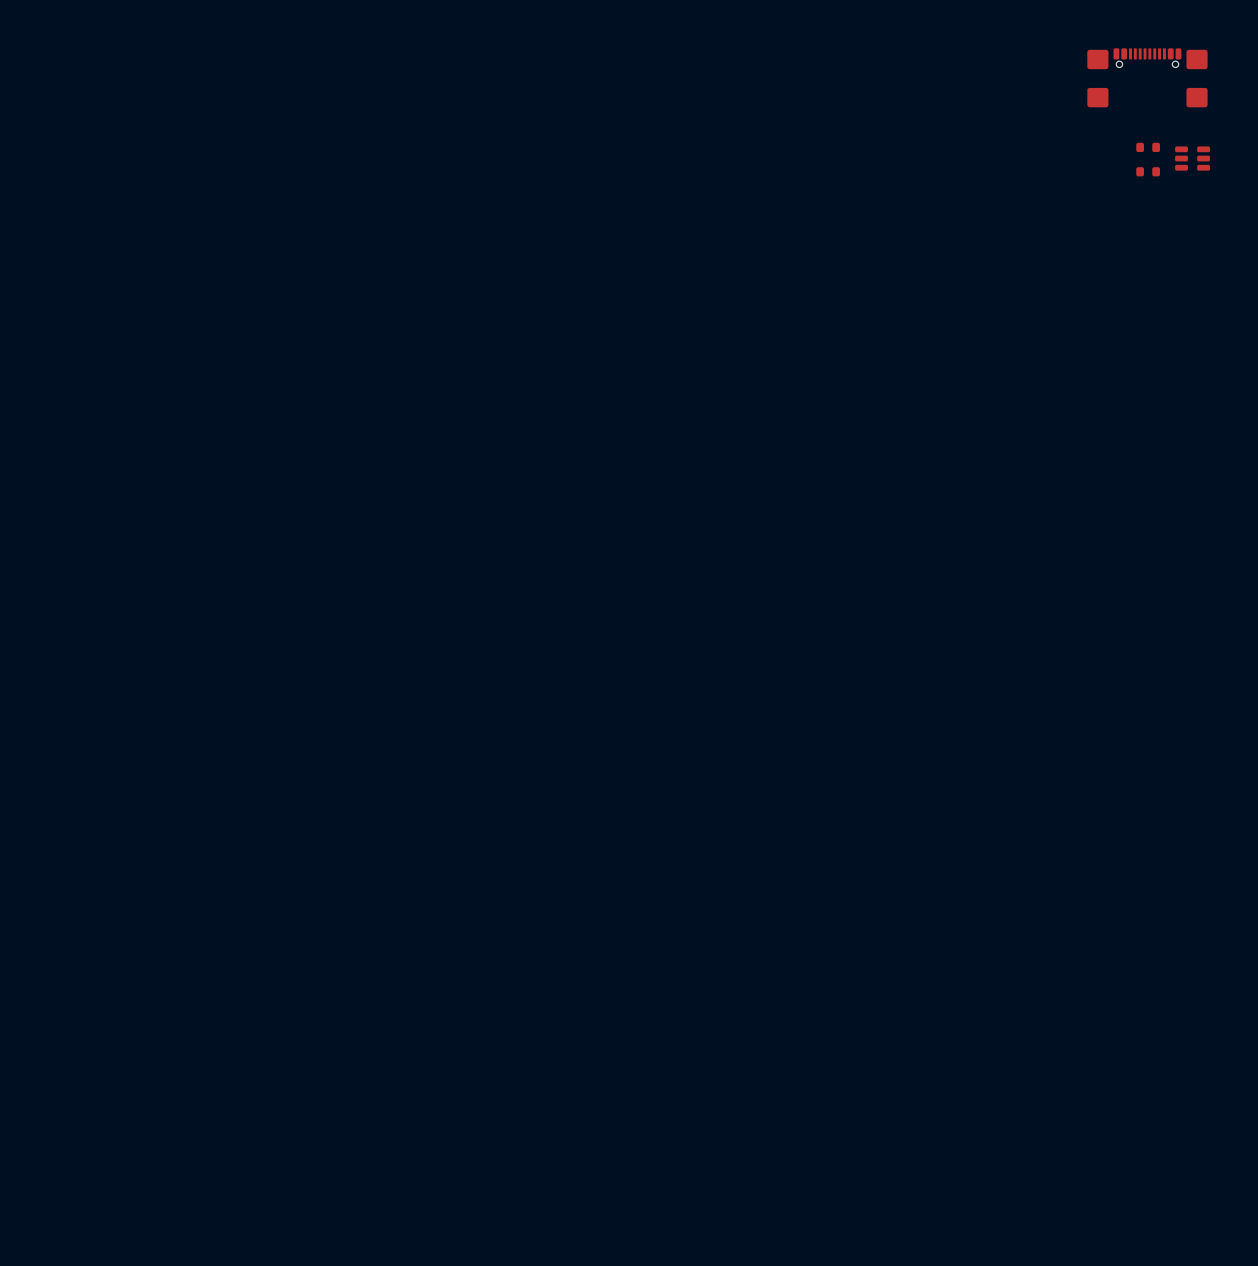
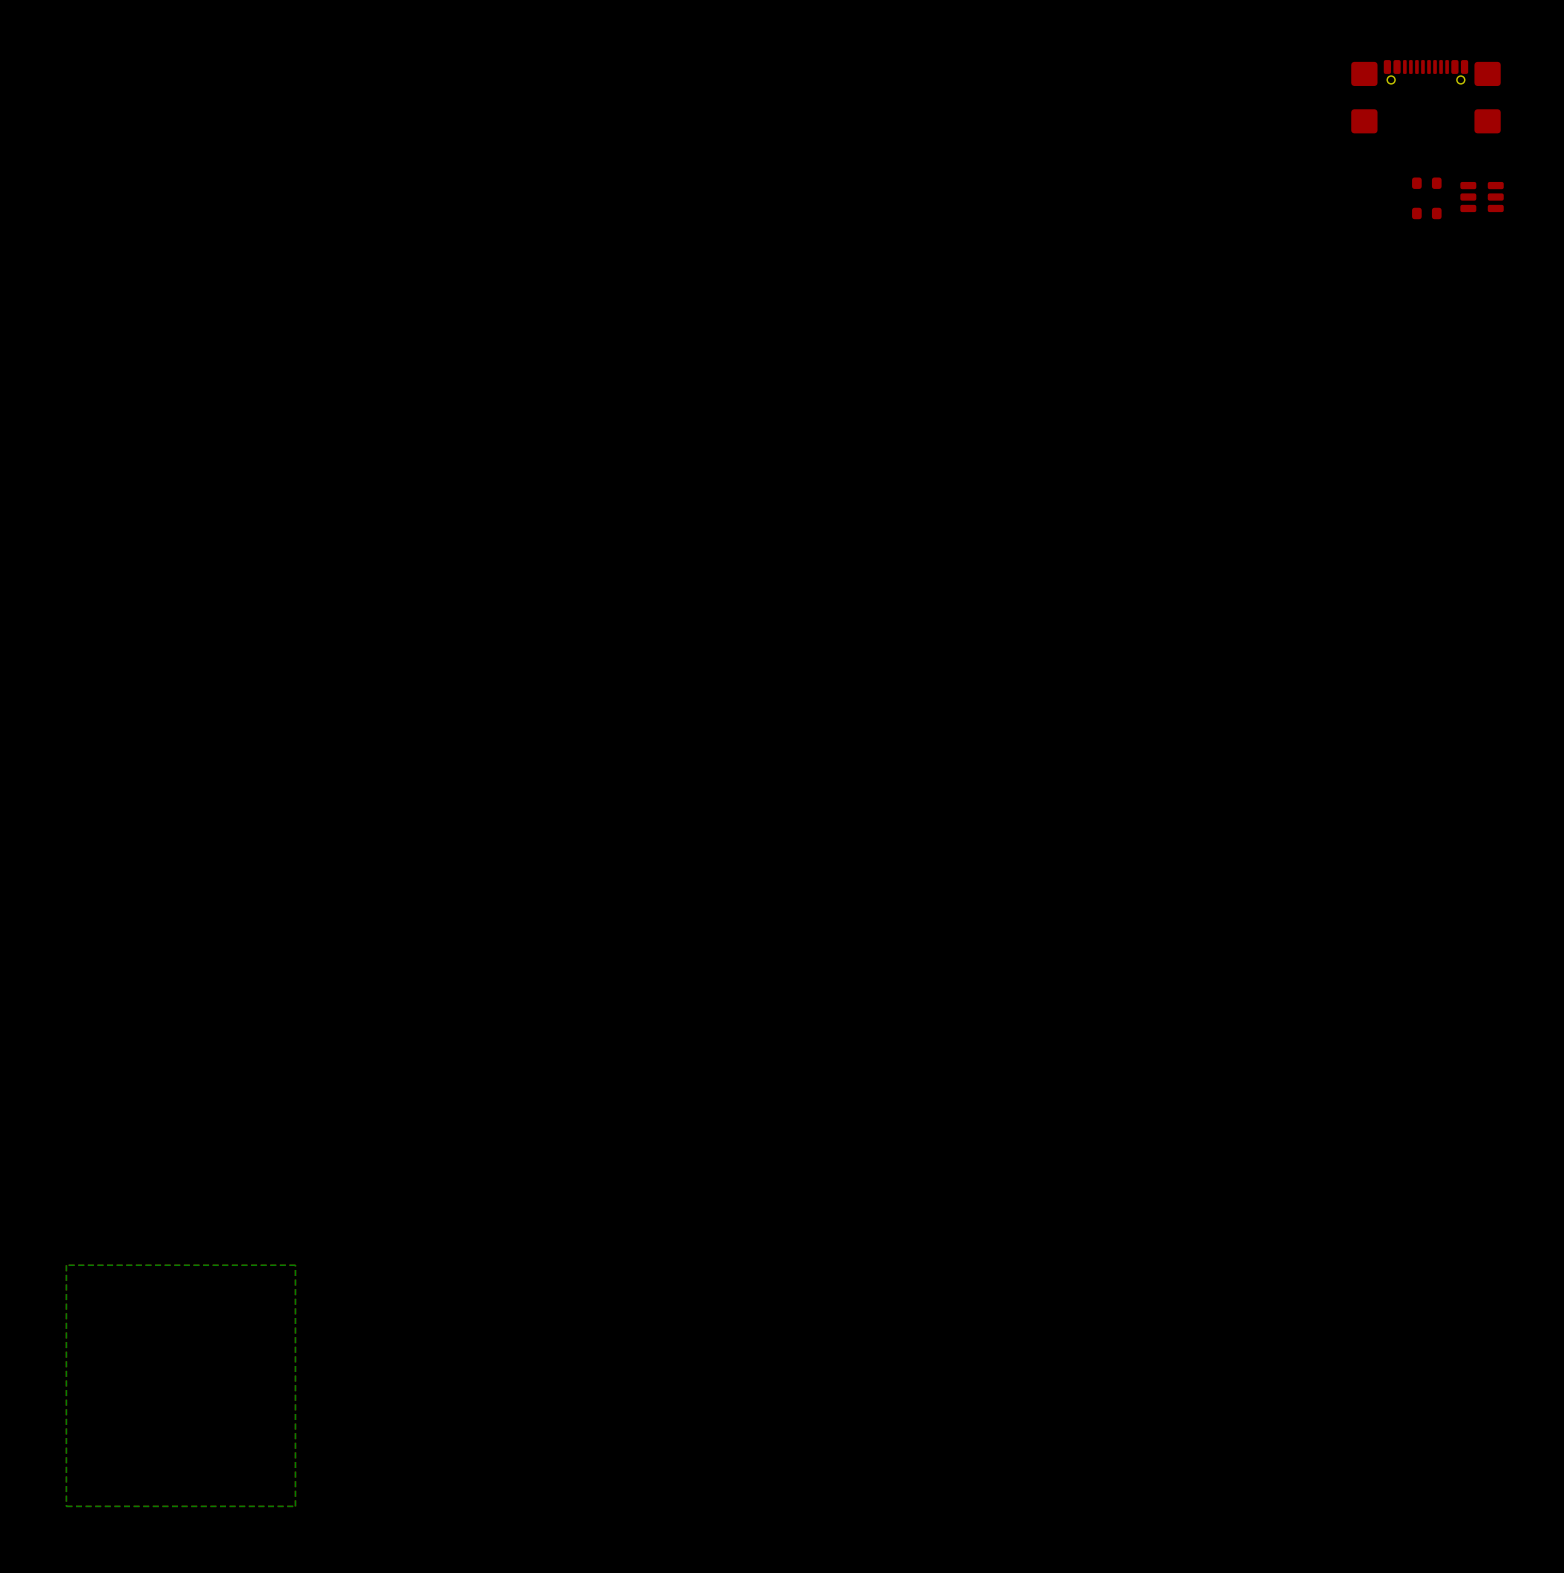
bottom zone outline: none -> (295, 1265) (66, 1265) (66, 1506) (295, 1506) (295, 1265)

